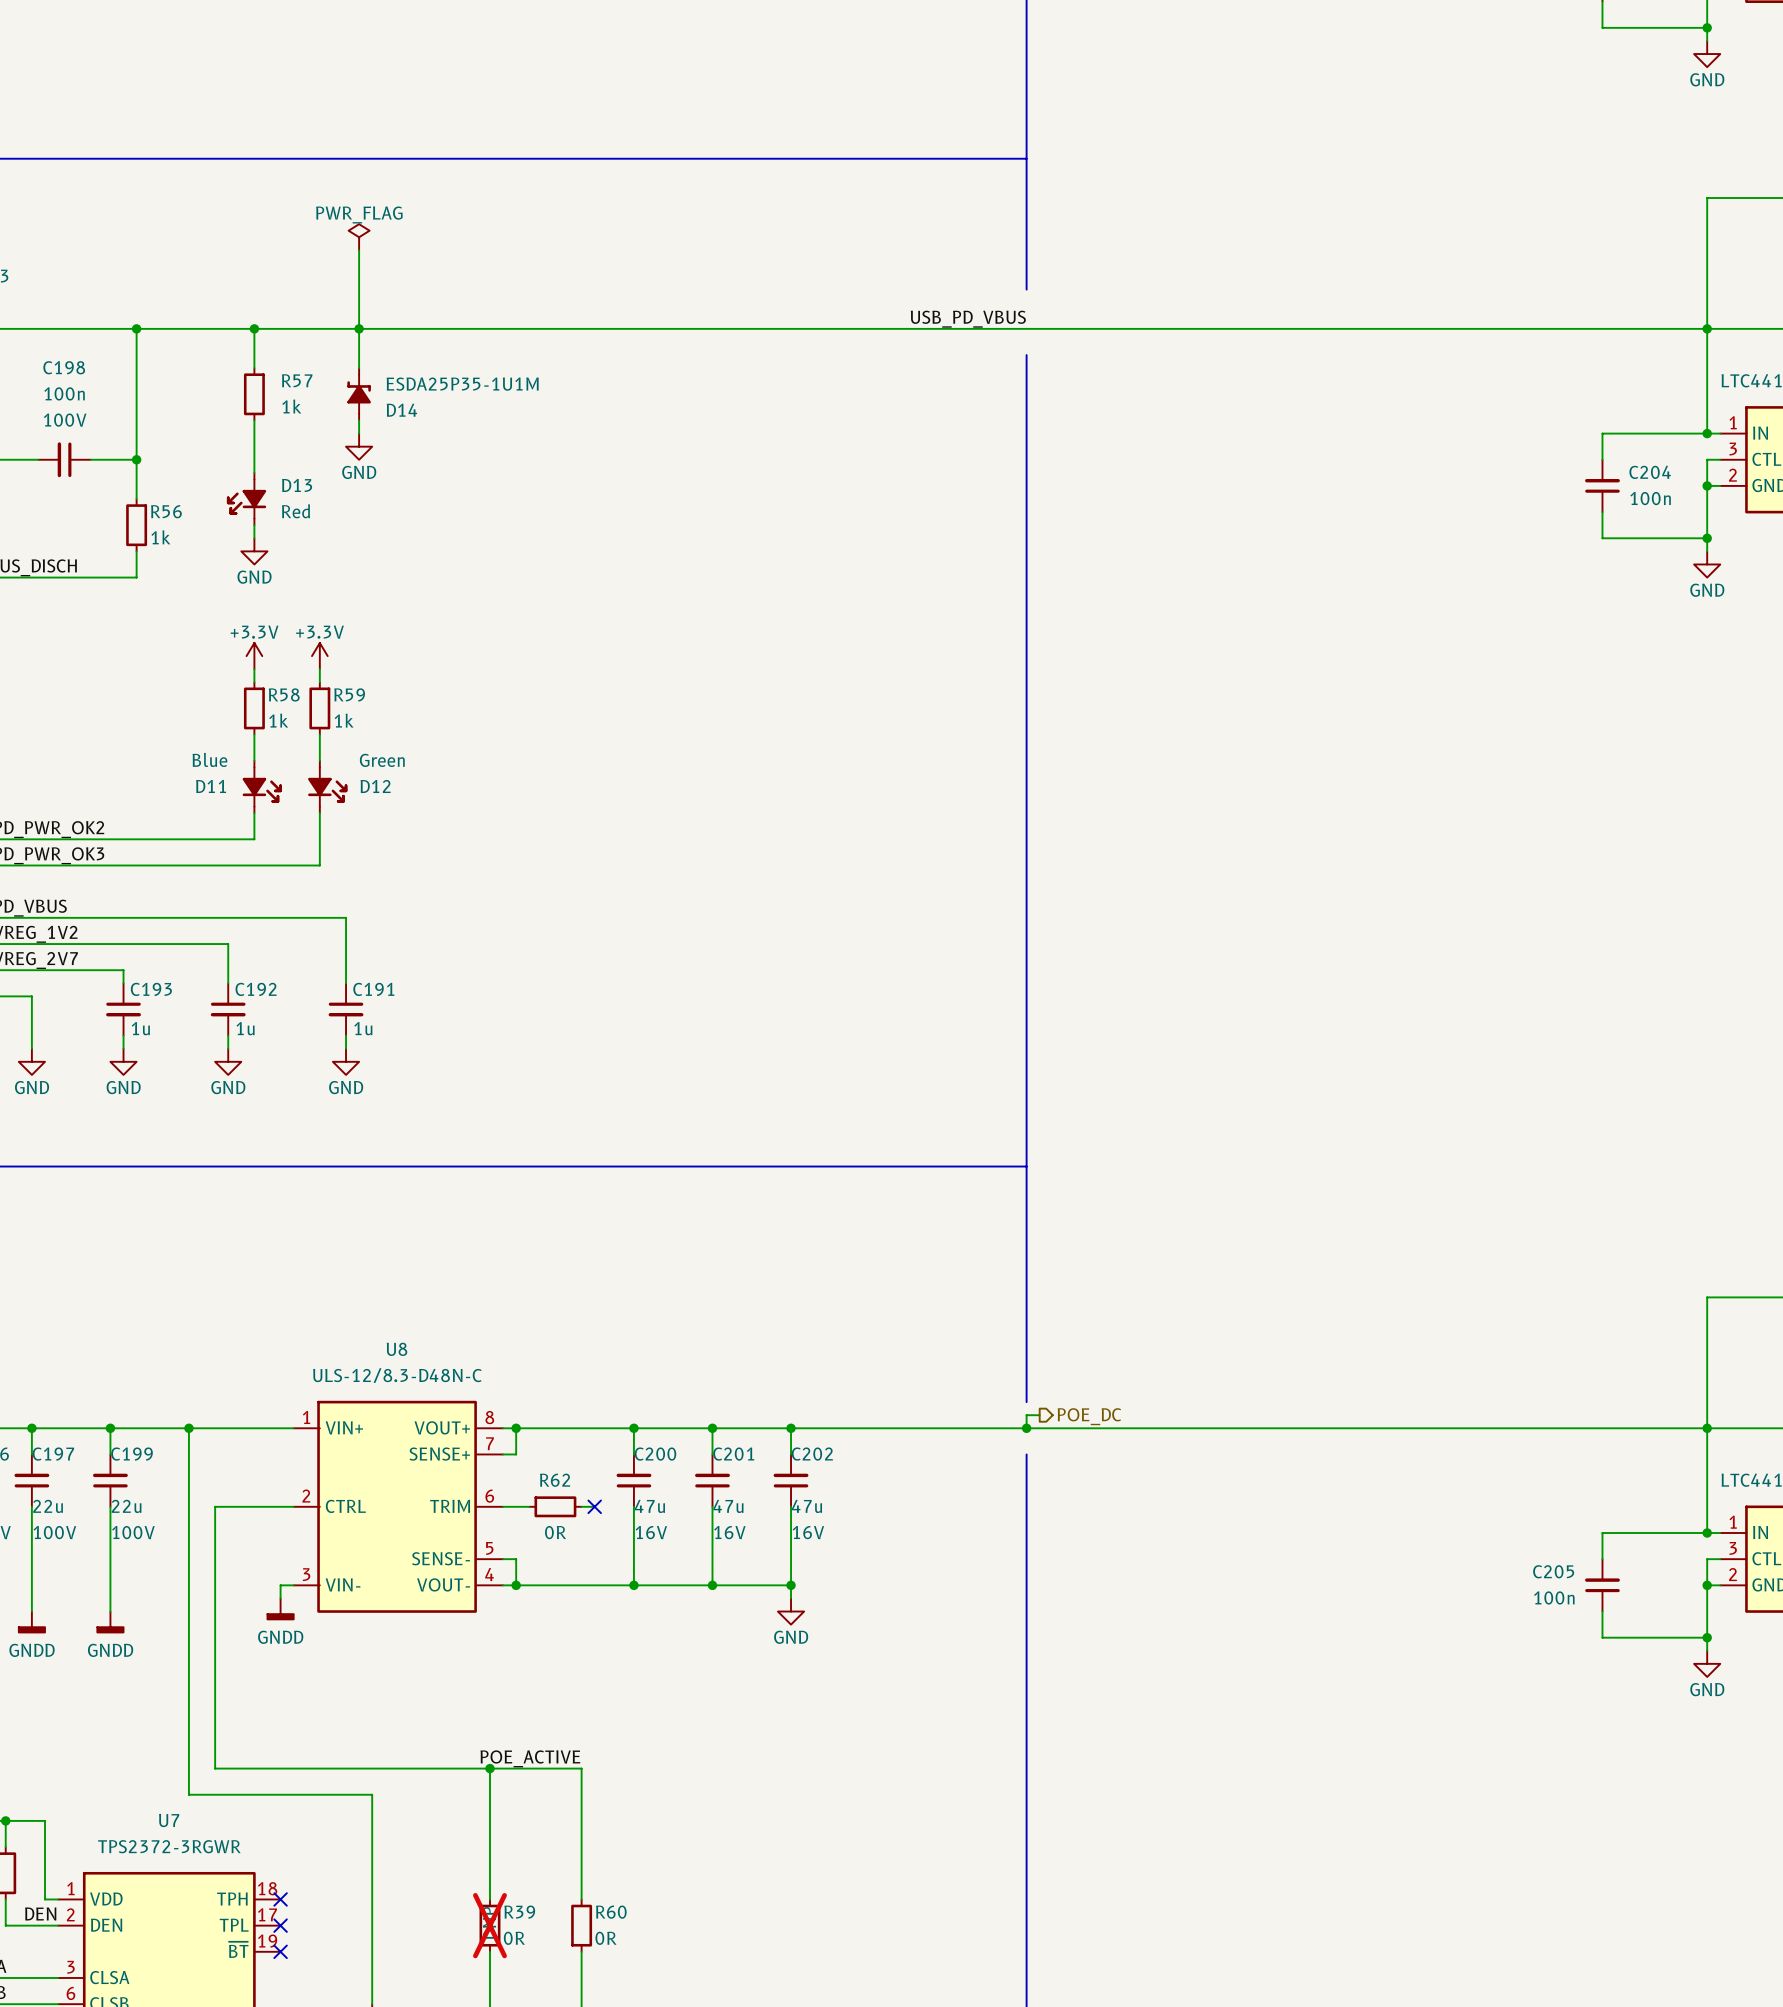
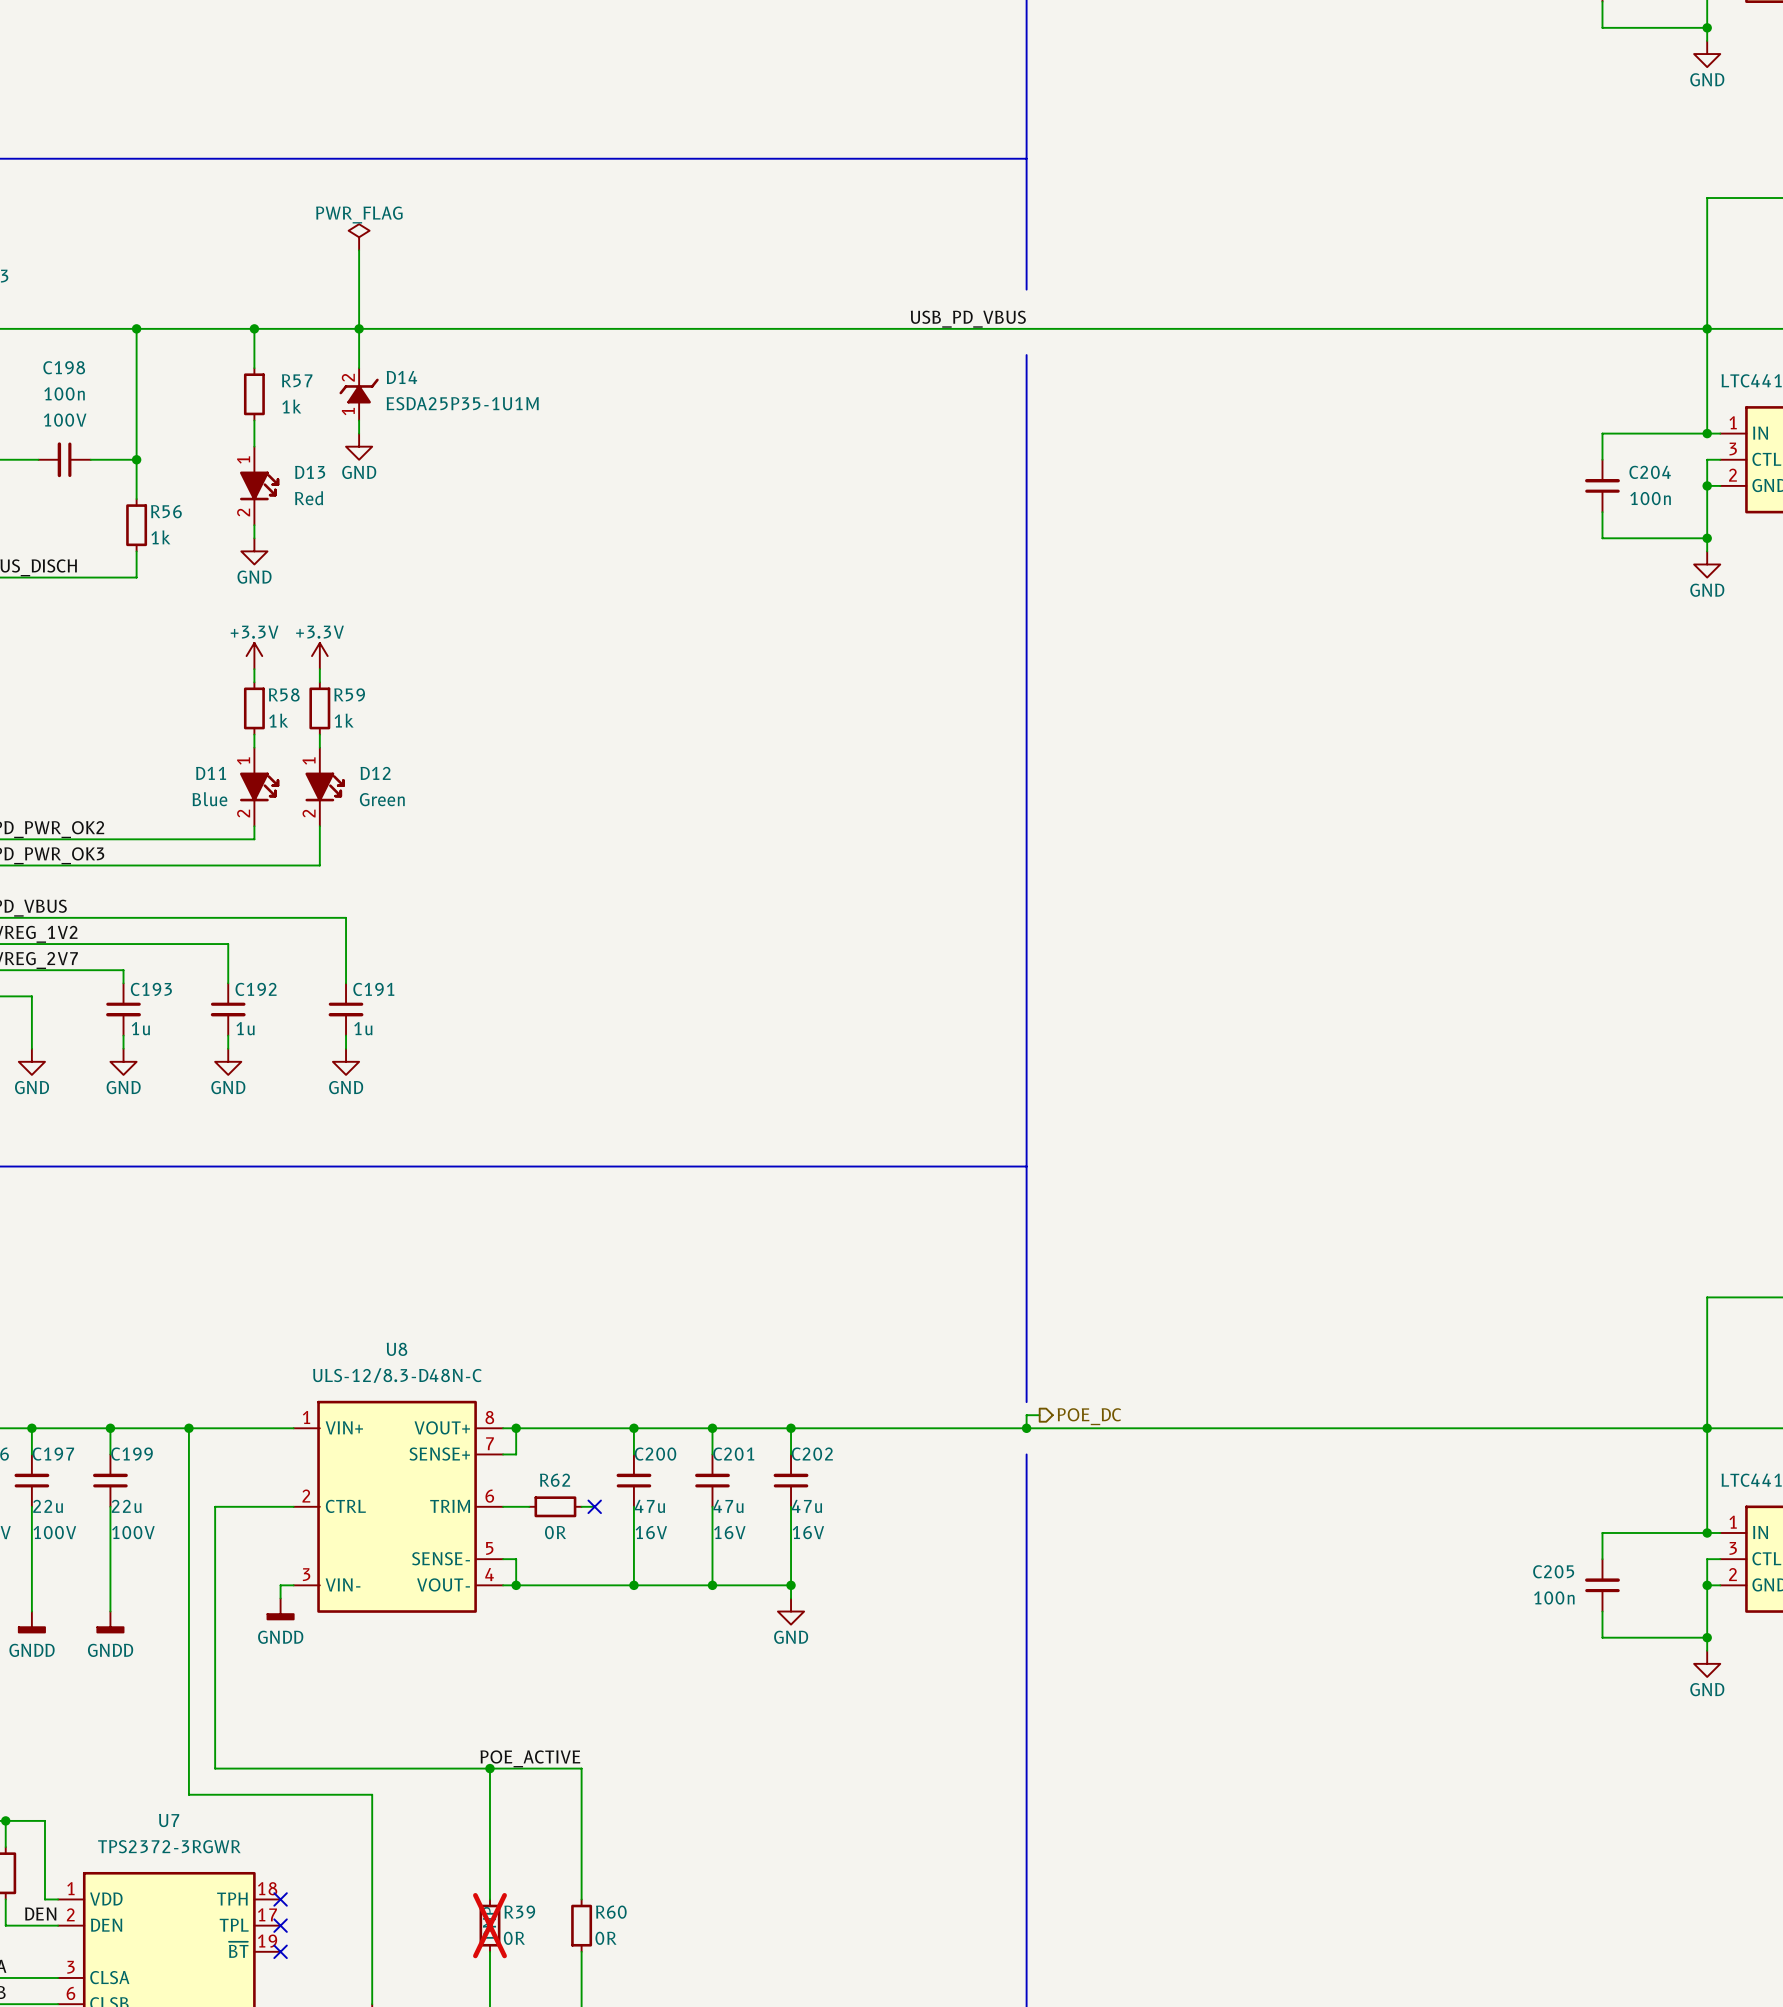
D14 symbol: [347, 368, 371, 421] -> [339, 368, 379, 421]
D14 name position: D14 (401, 410) -> D14 (401, 377)
D13 symbol: [226, 472, 267, 526] -> [240, 446, 280, 526]
D11 text position: Blue (209, 759) -> Blue (209, 799)
D11 symbol: [242, 760, 282, 814] -> [240, 747, 280, 827]
D12 symbol: [308, 760, 348, 814] -> [305, 747, 345, 827]
D12 text position: Green (382, 760) -> Green (382, 799)

